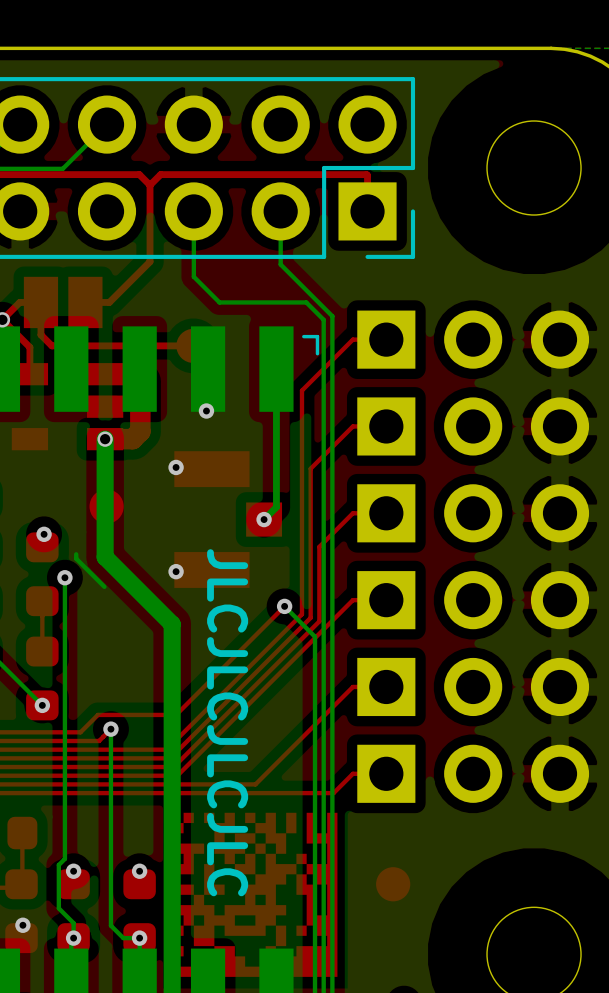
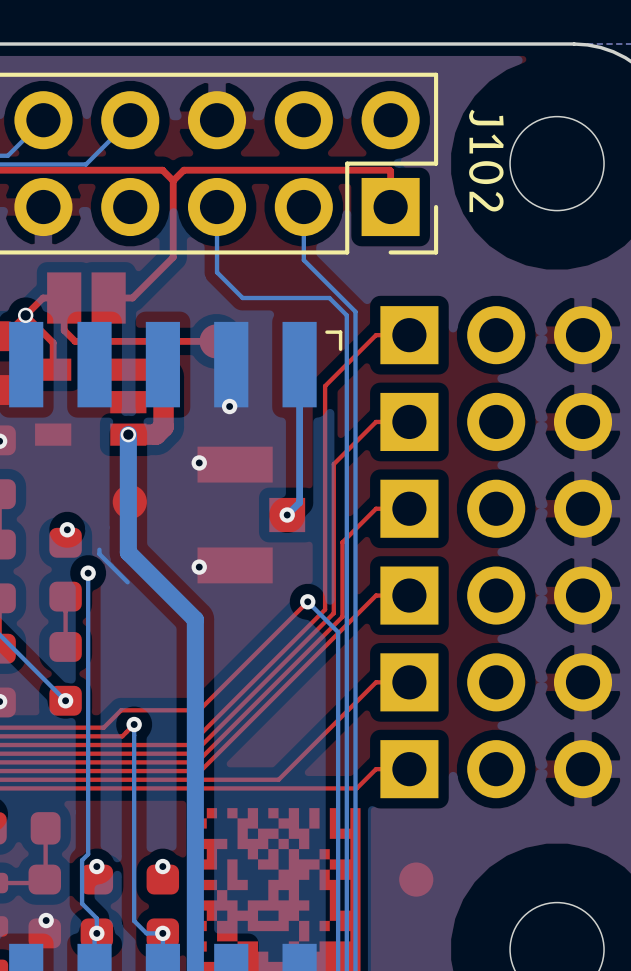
J102 name: none -> J102 (486, 160)
text: JLCJLCJLCJLC (227, 722) -> none

